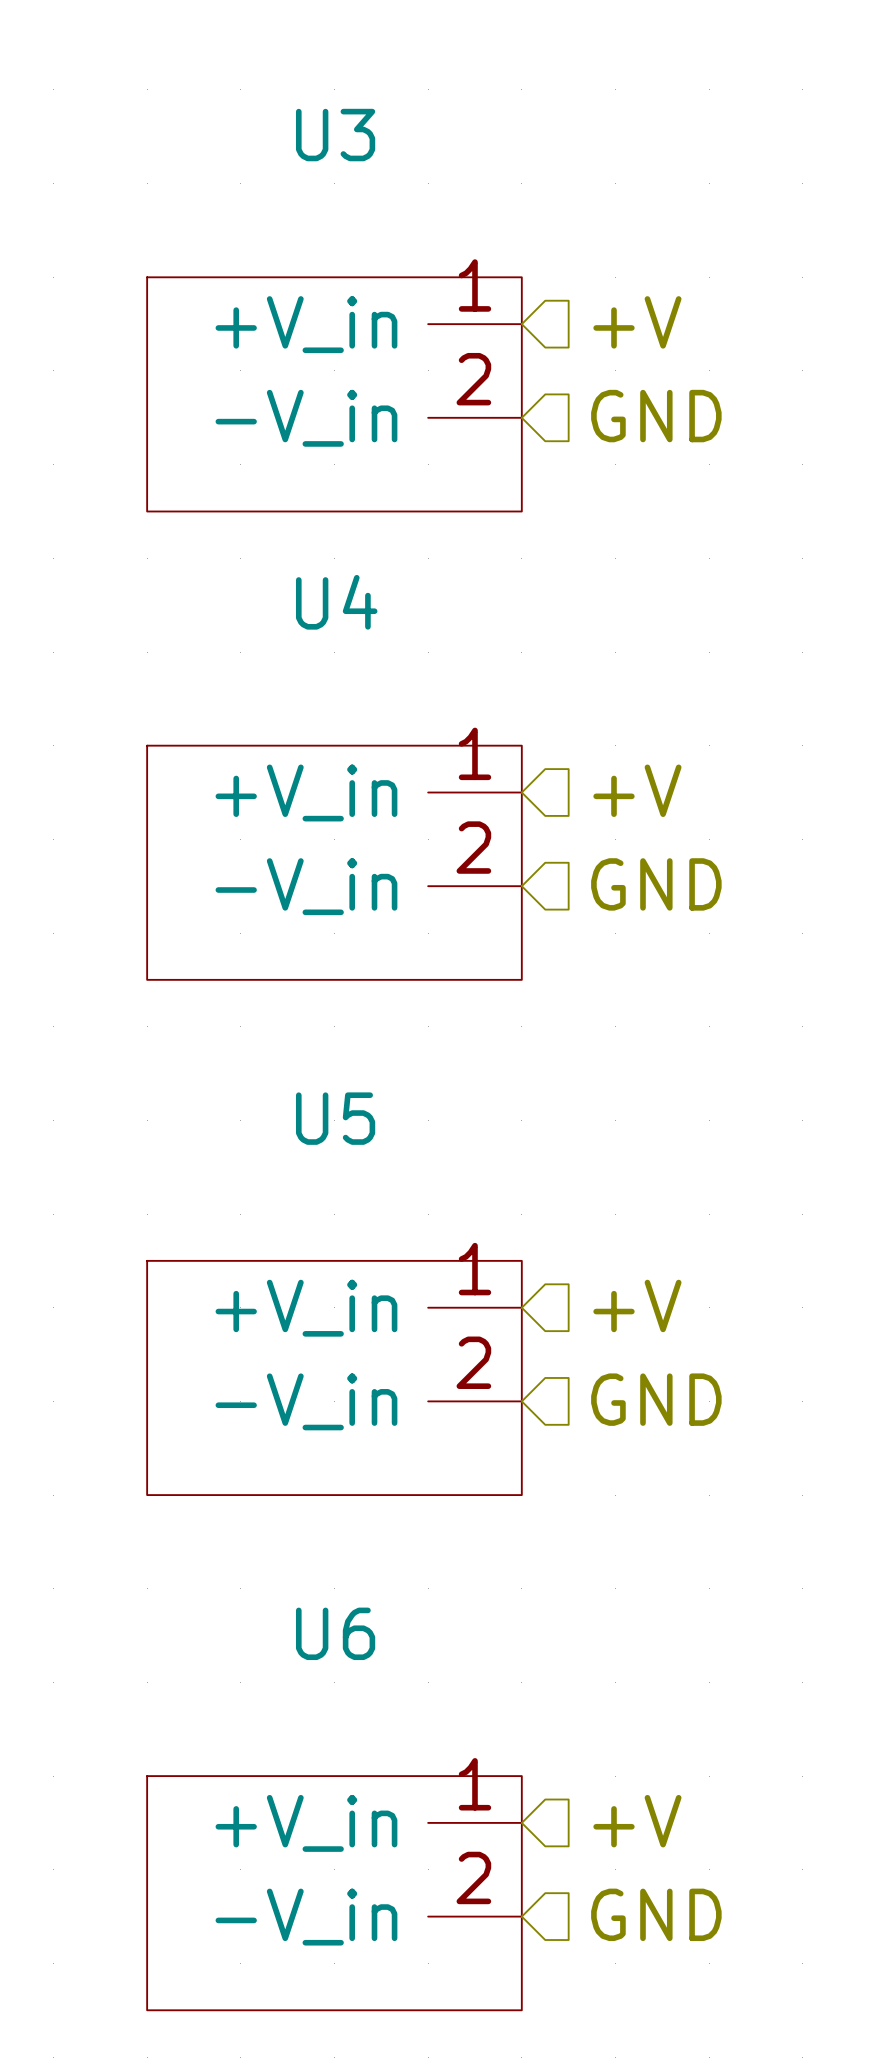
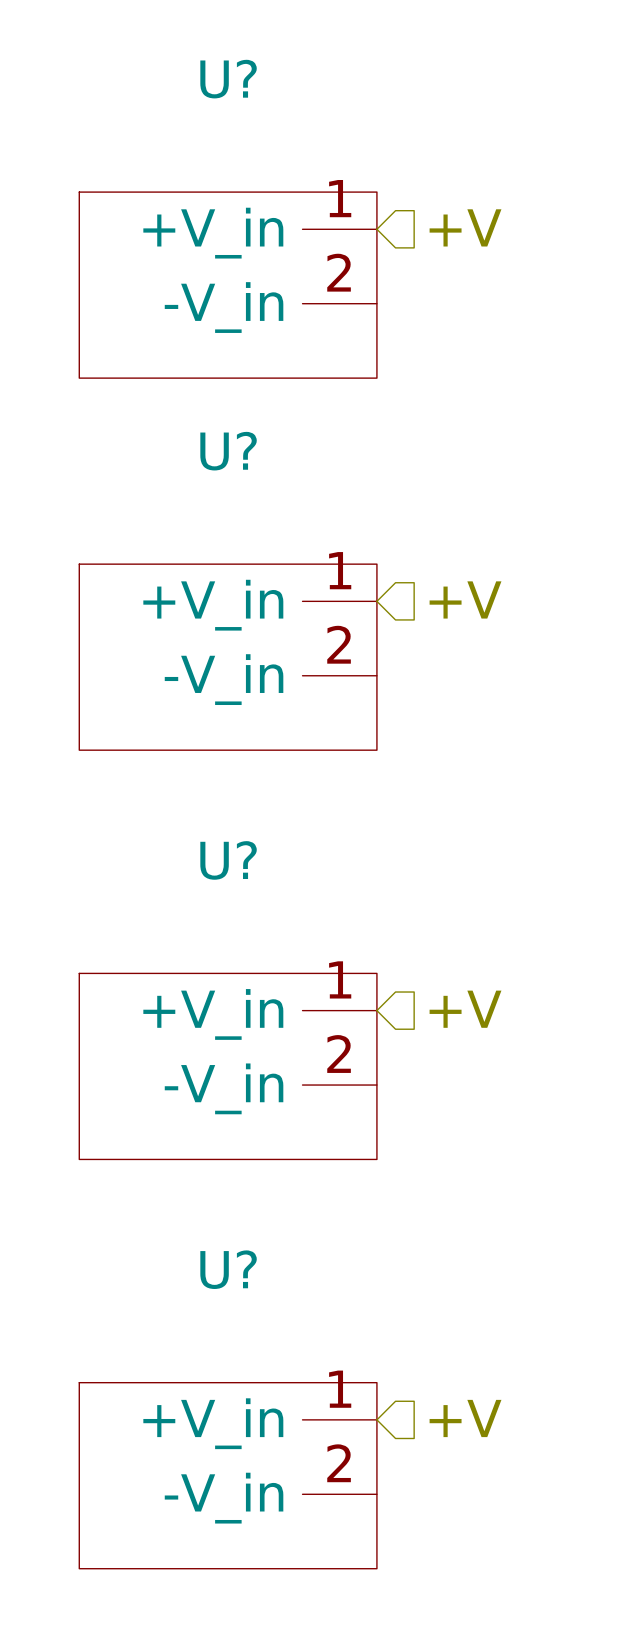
U3 name: U3 (335, 135) -> U? (228, 79)
hierarchical label: GND (656, 416) -> none
U4 name: U4 (336, 602) -> U? (228, 451)
hierarchical label: GND (656, 884) -> none
U5 name: U5 (335, 1118) -> U? (228, 860)
hierarchical label: GND (656, 1399) -> none
U6 name: U6 (335, 1633) -> U? (228, 1269)
hierarchical label: GND (656, 1914) -> none

